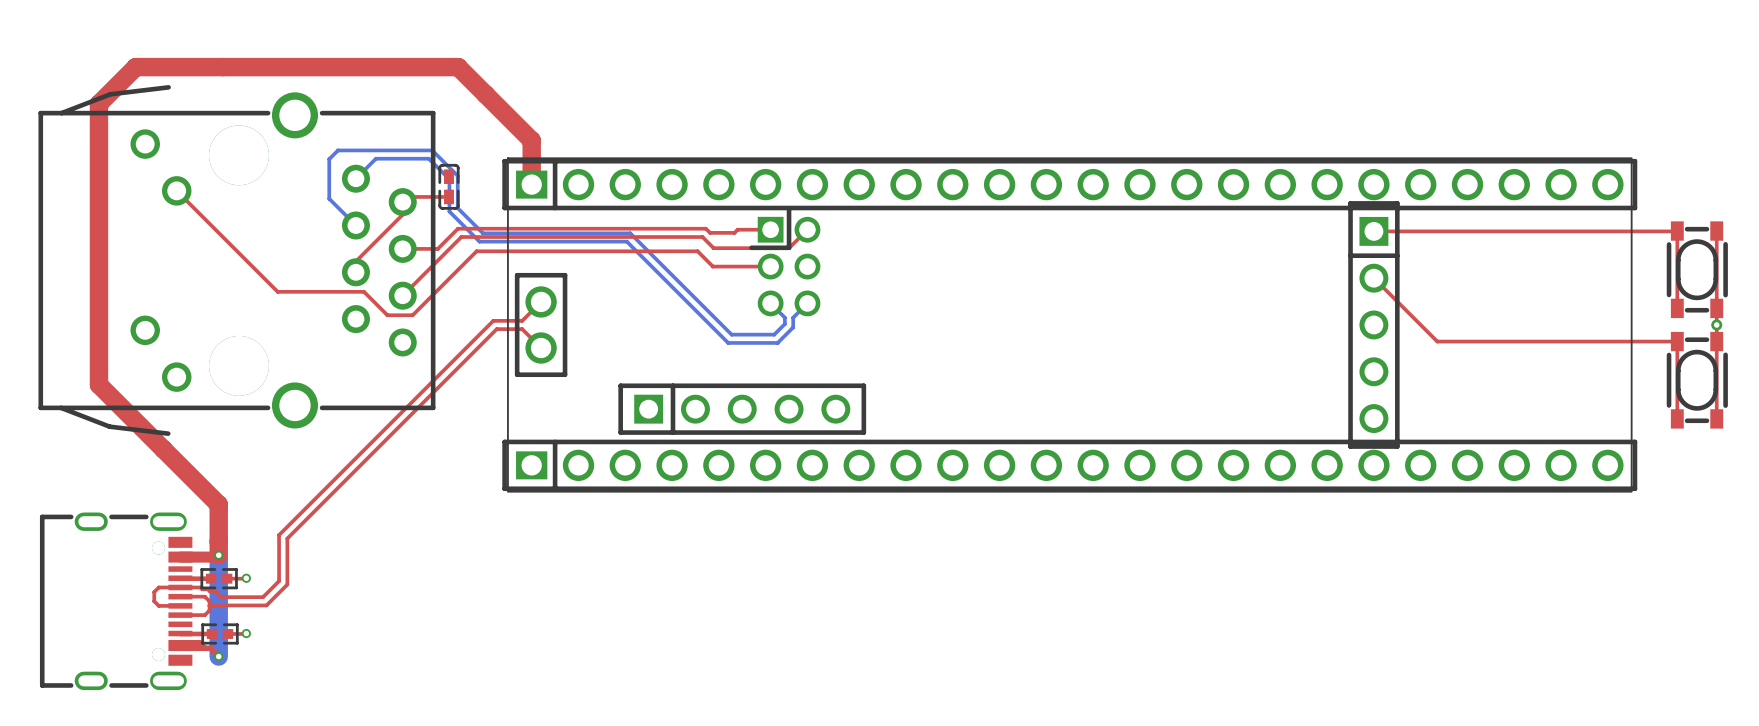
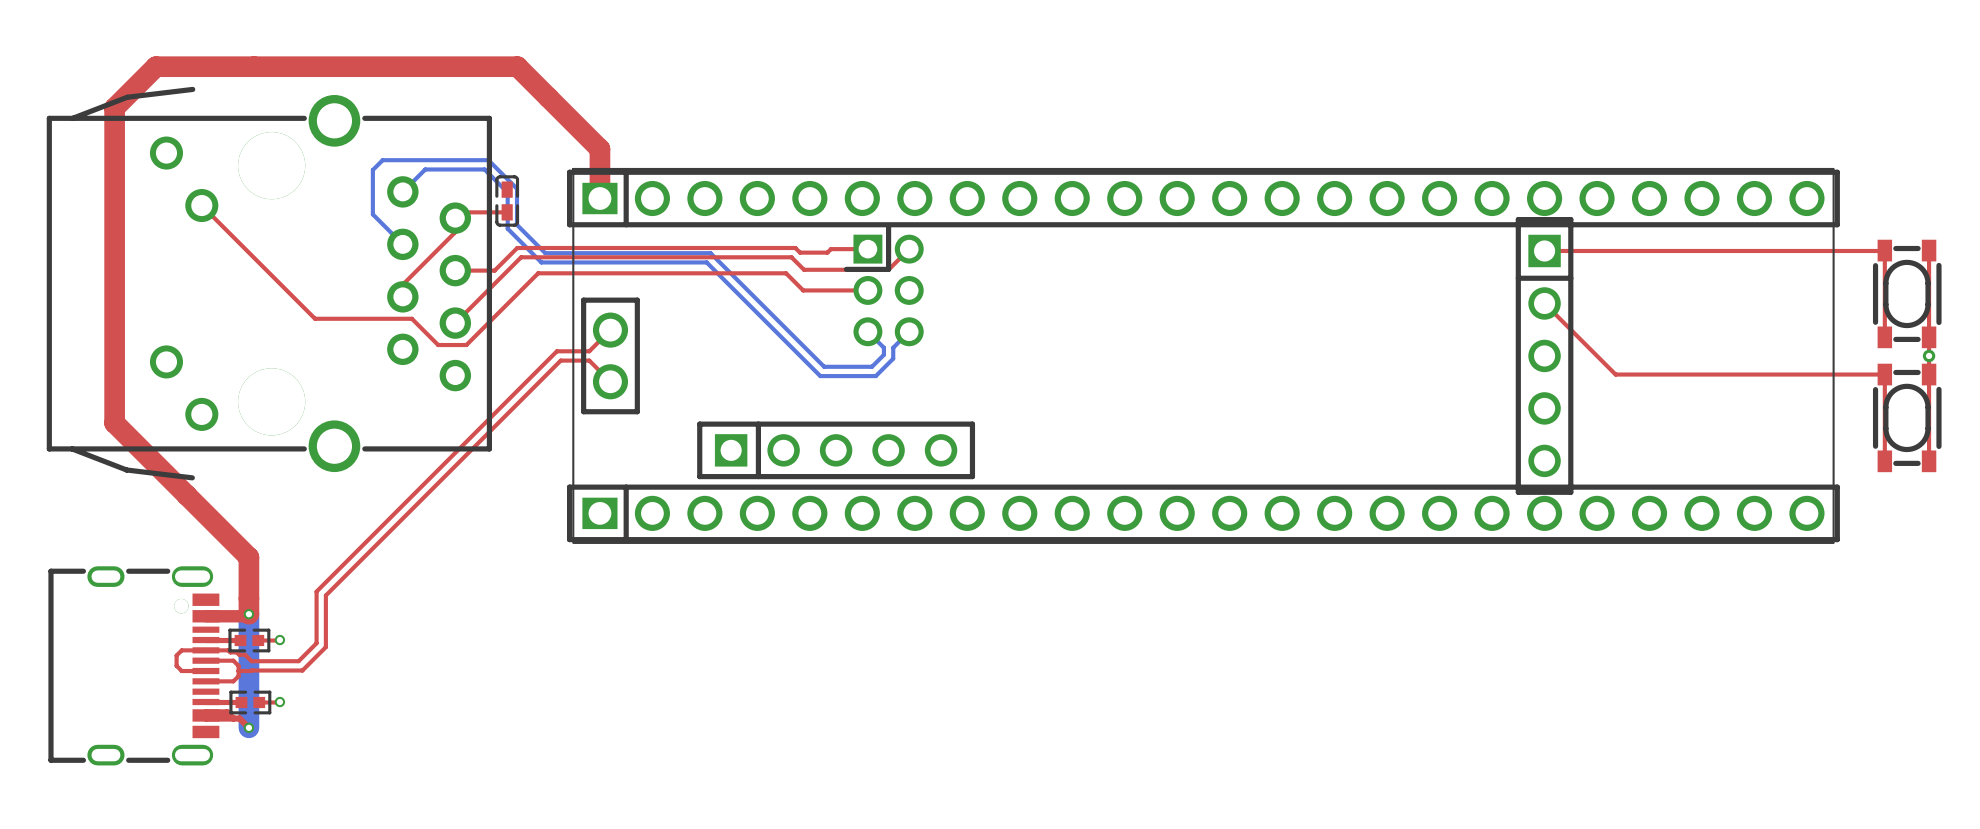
part footprint: [39, 512, 193, 691] -> [48, 566, 220, 766]

